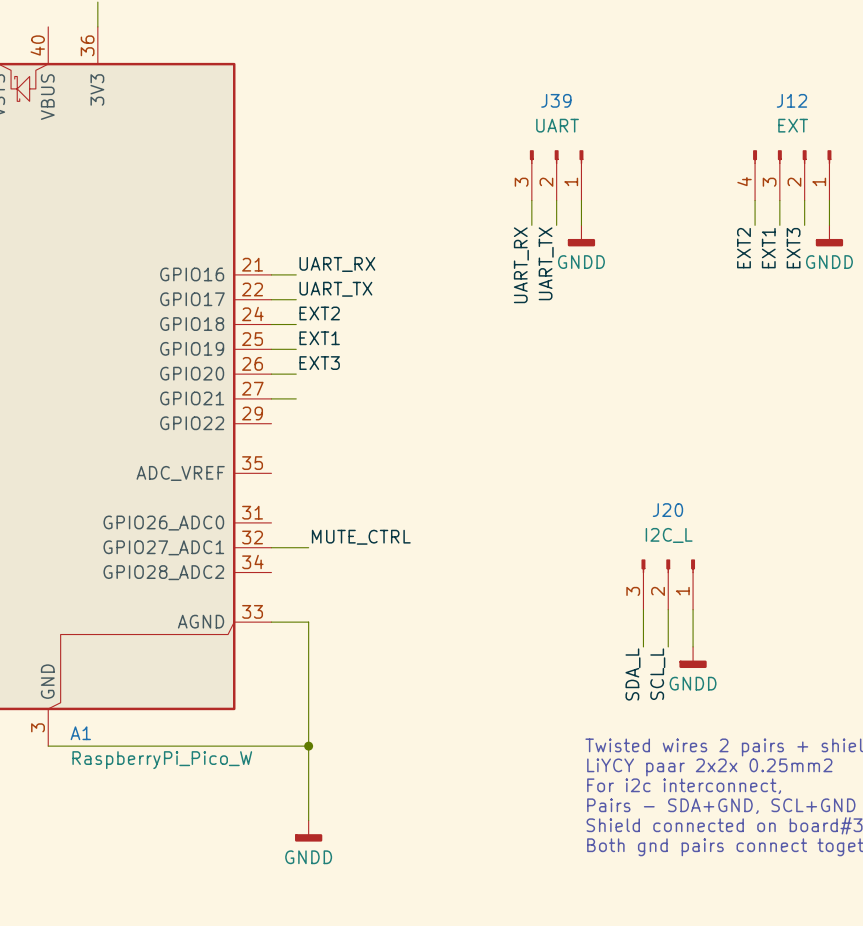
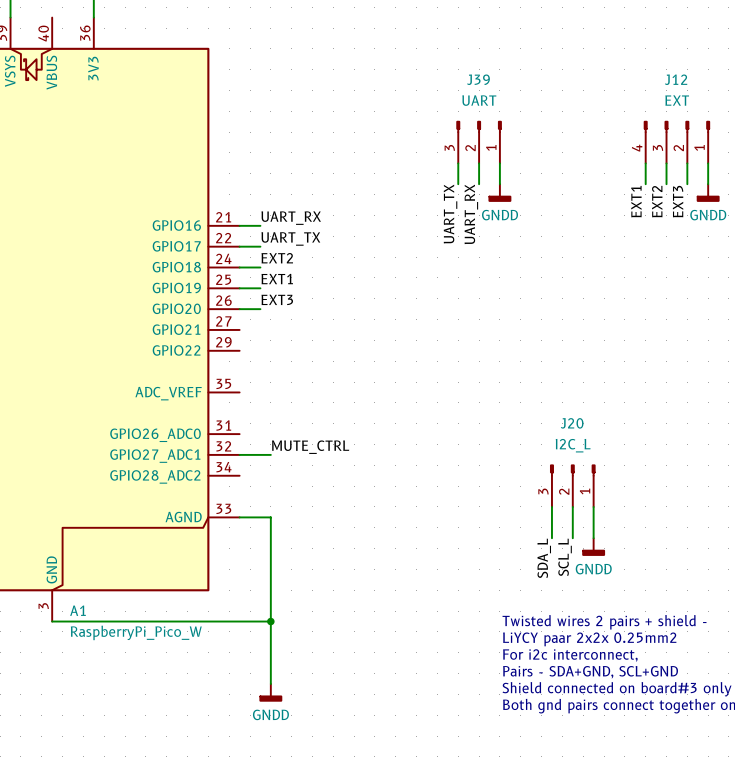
label: EXT2 (743, 248) -> EXT1 (636, 201)
label: EXT1 (768, 248) -> EXT2 (657, 201)
label: UART_TX (546, 263) -> UART_RX (471, 214)
label: UART_RX (521, 265) -> UART_TX (450, 214)
wire: (271, 398) (296, 398) -> none

